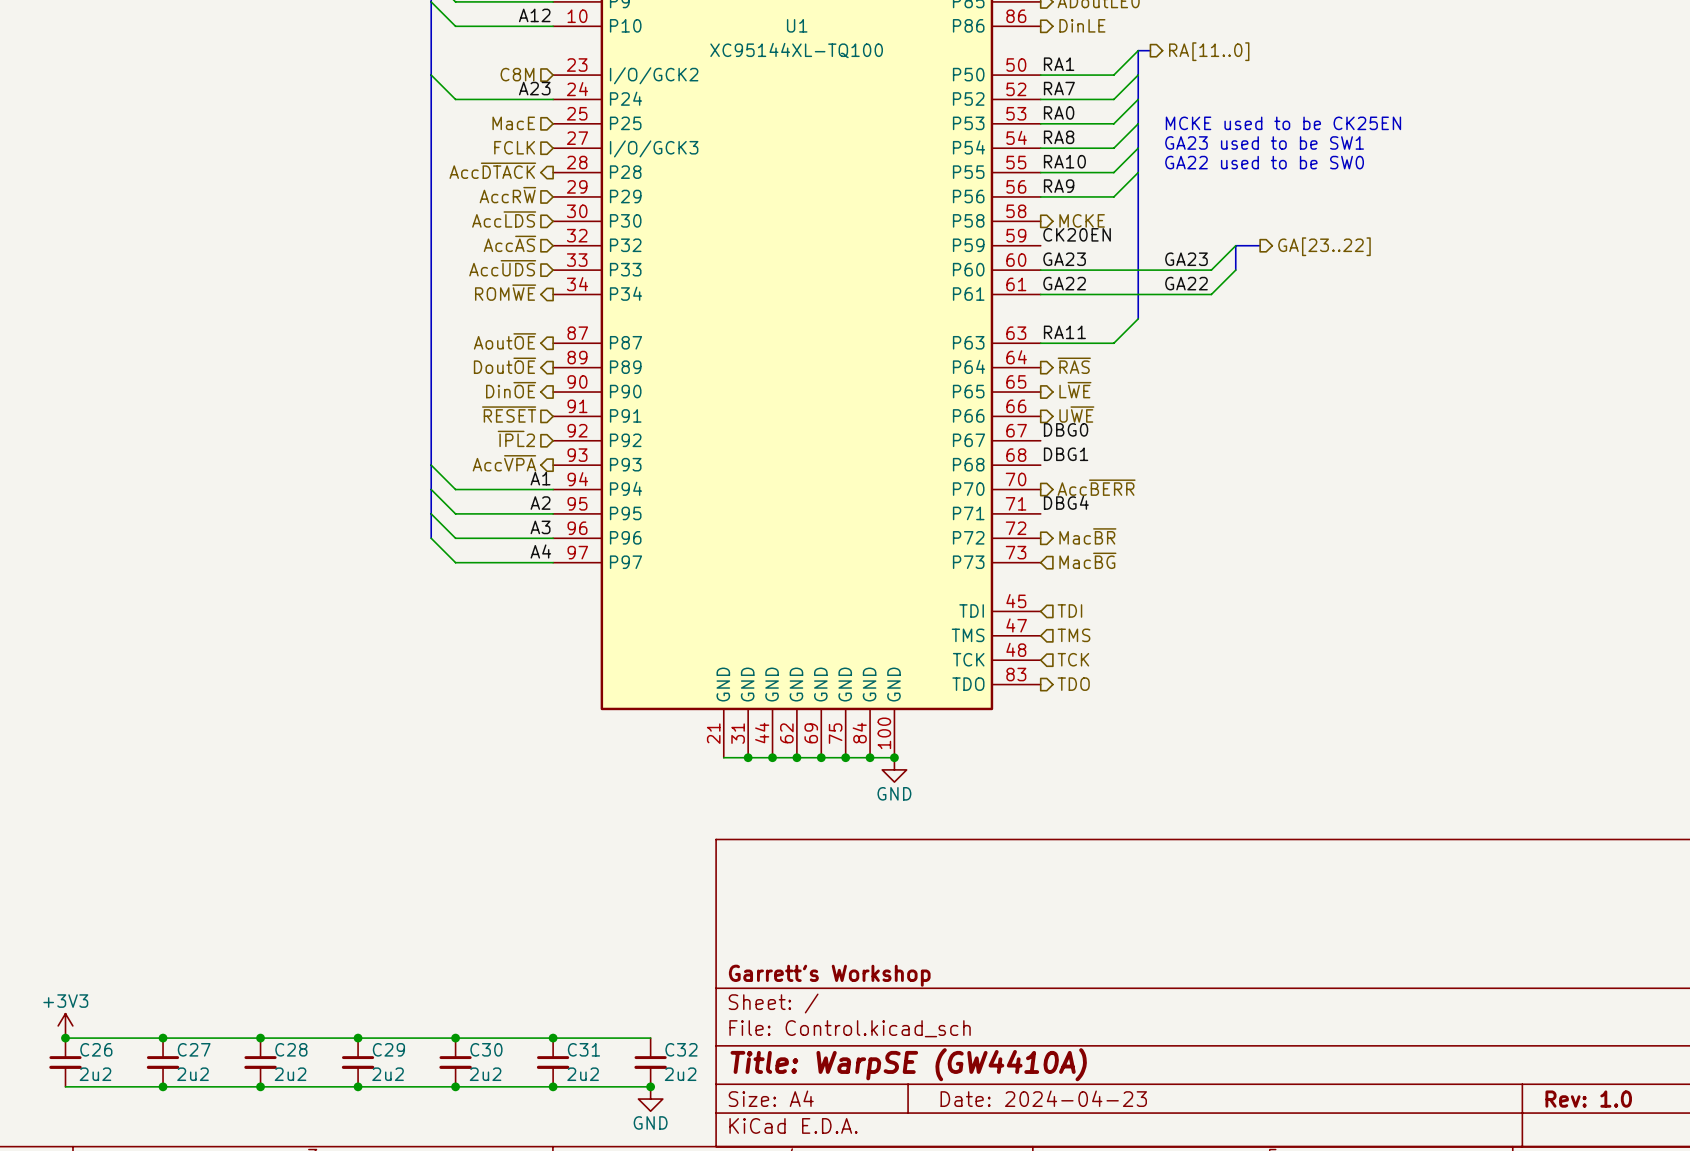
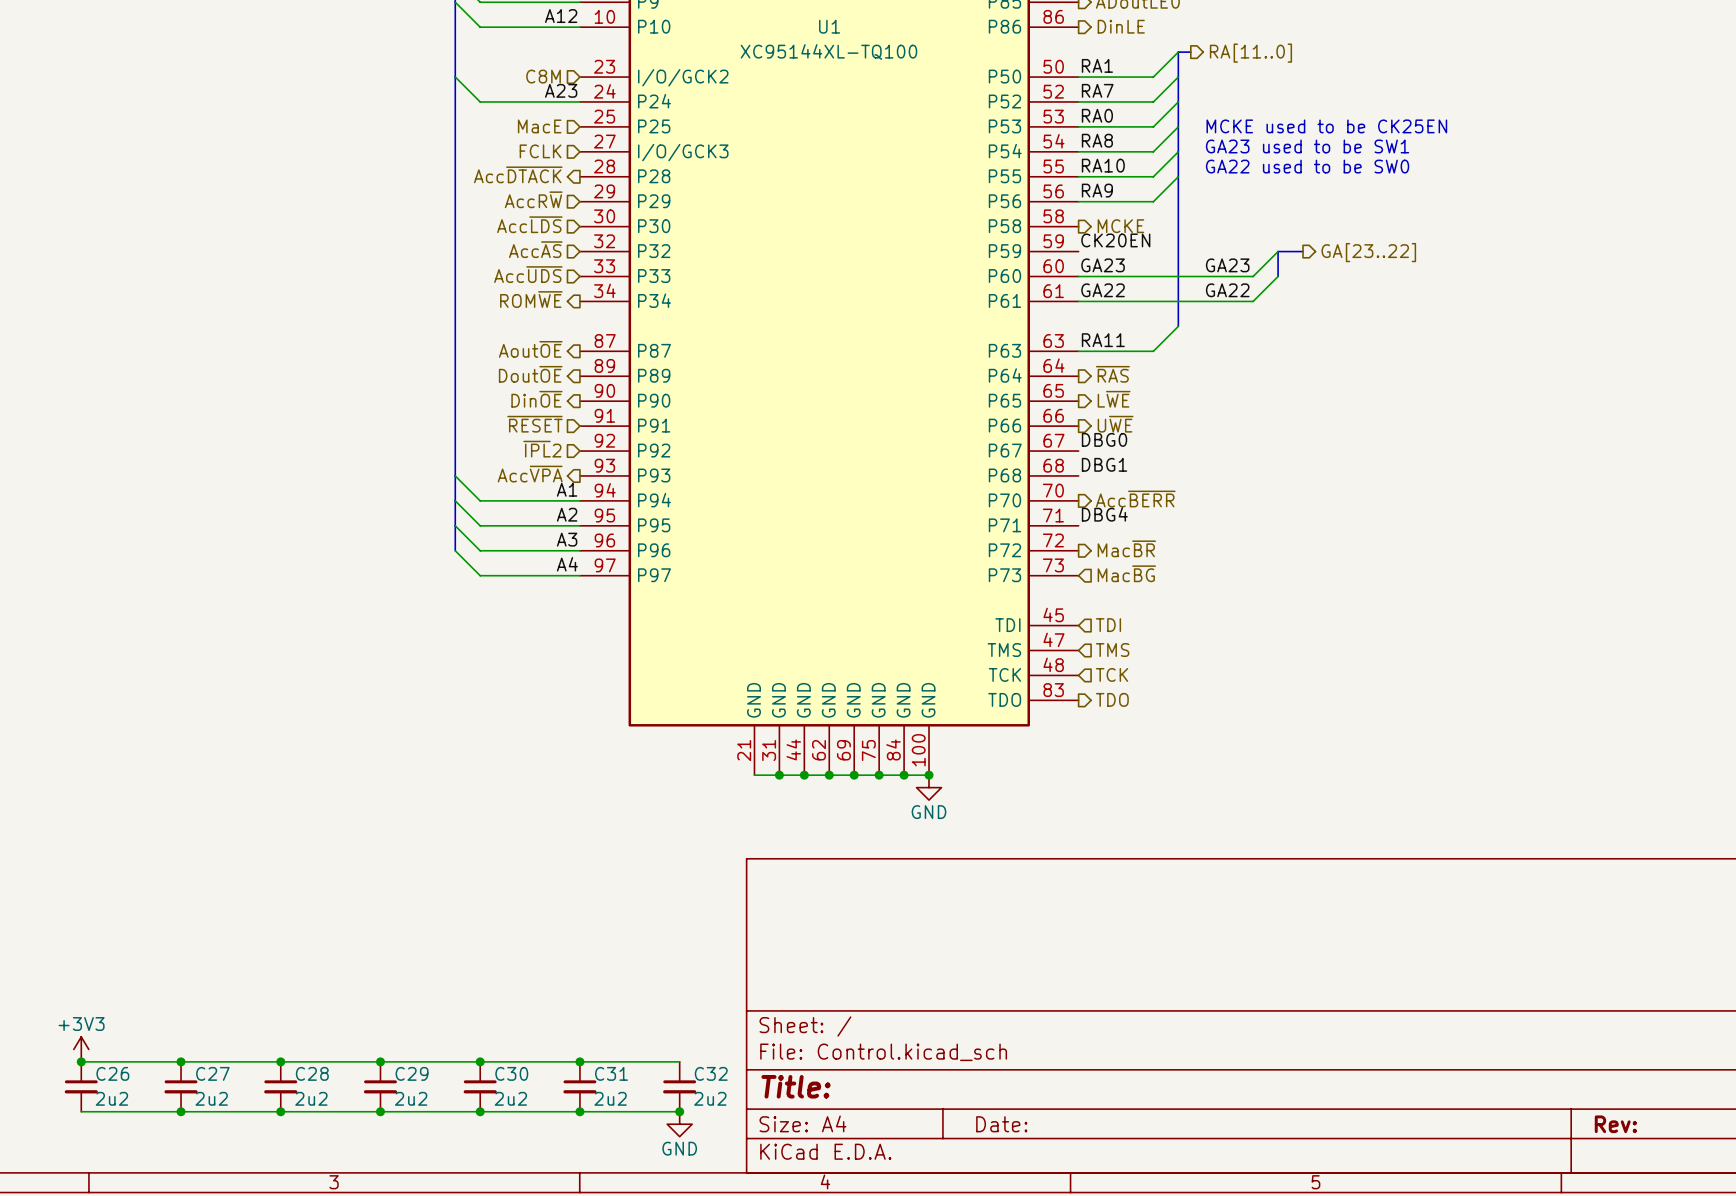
title block: Garrett's Workshop (829, 975) -> none
title block: Title: WarpSE (GW4410A) (908, 1064) -> Title: (796, 1086)
title block: Date: 2024-04-23 (1043, 1098) -> Date: (1001, 1124)
title block: Rev: 1.0 (1588, 1099) -> Rev: (1615, 1124)

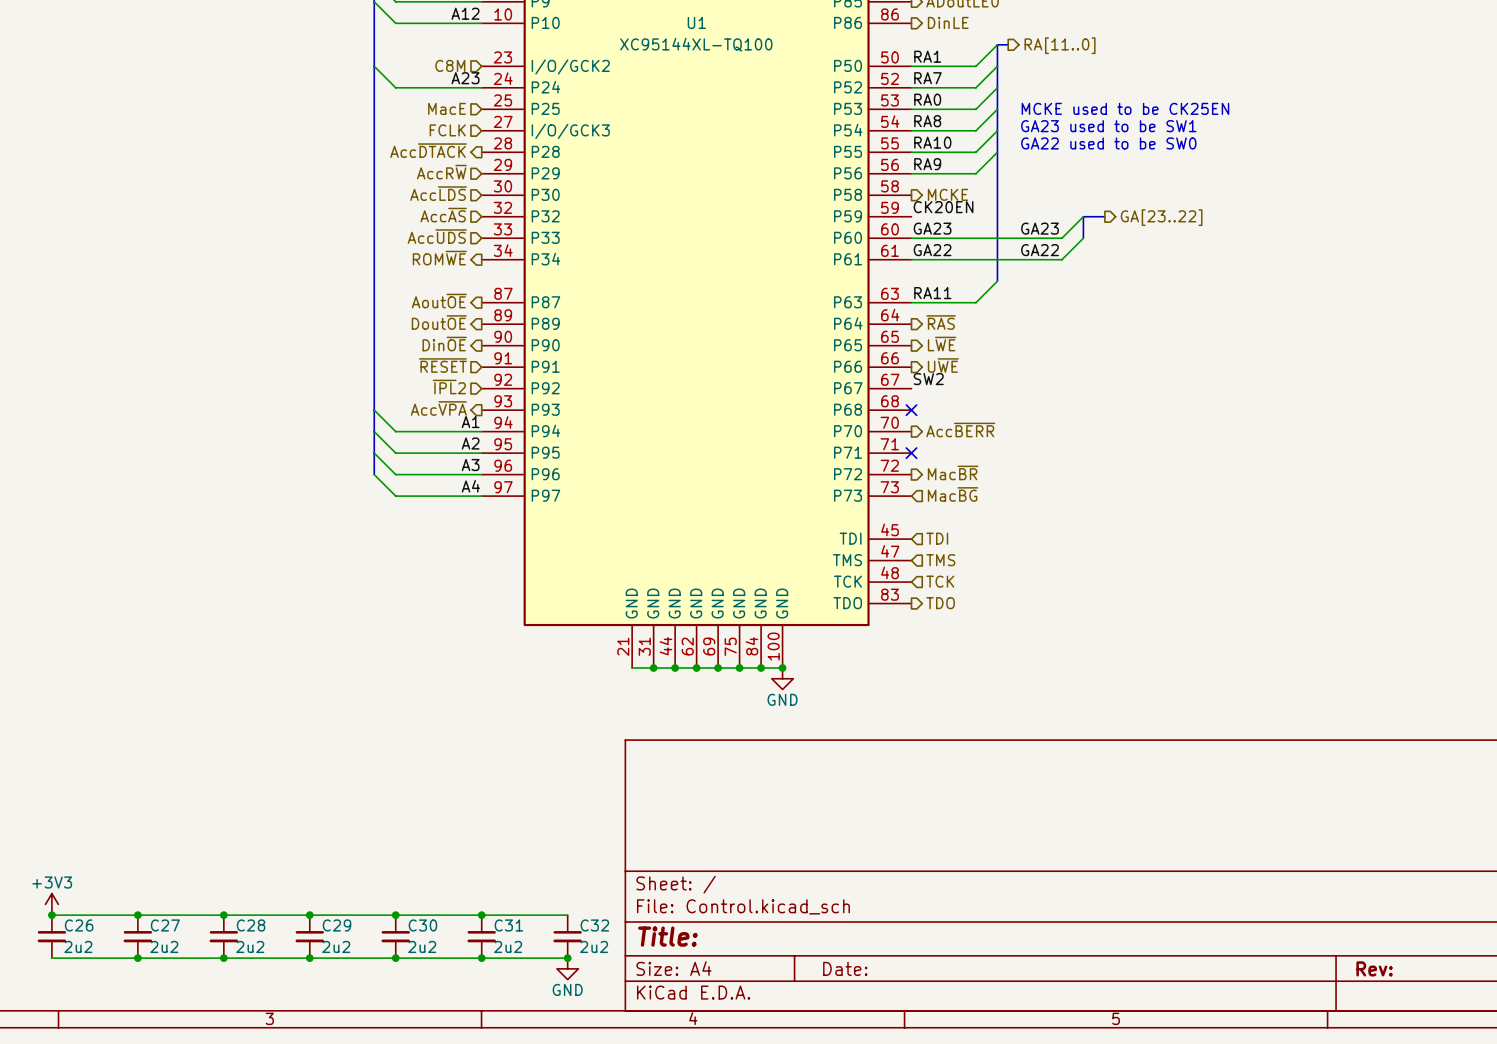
label: DBG0 (1104, 439) -> SW2 (928, 379)
label: DBG1 (1104, 464) -> none
no-connect mark: none -> (911, 410)
label: DBG4 (1104, 514) -> none
no-connect mark: none -> (911, 453)

